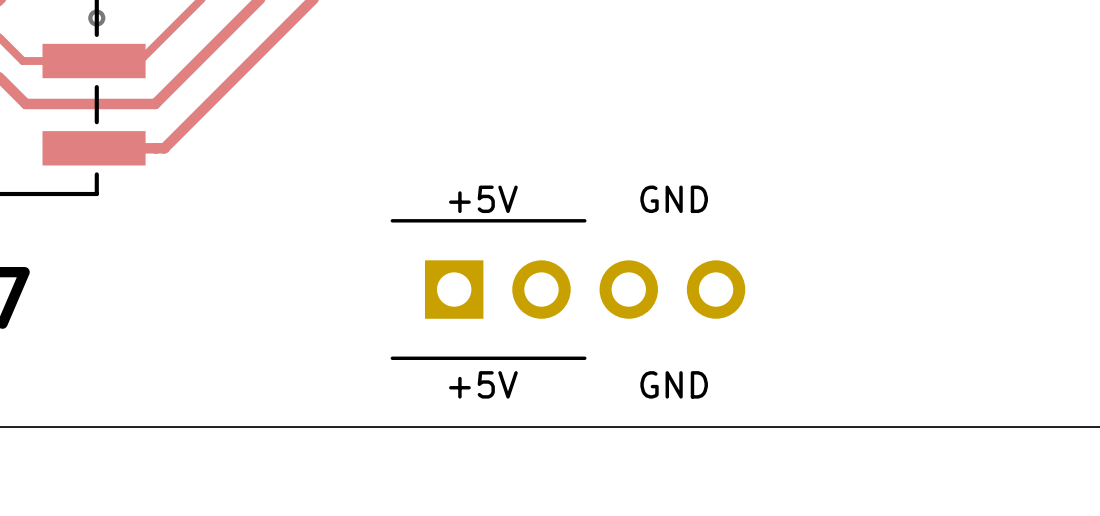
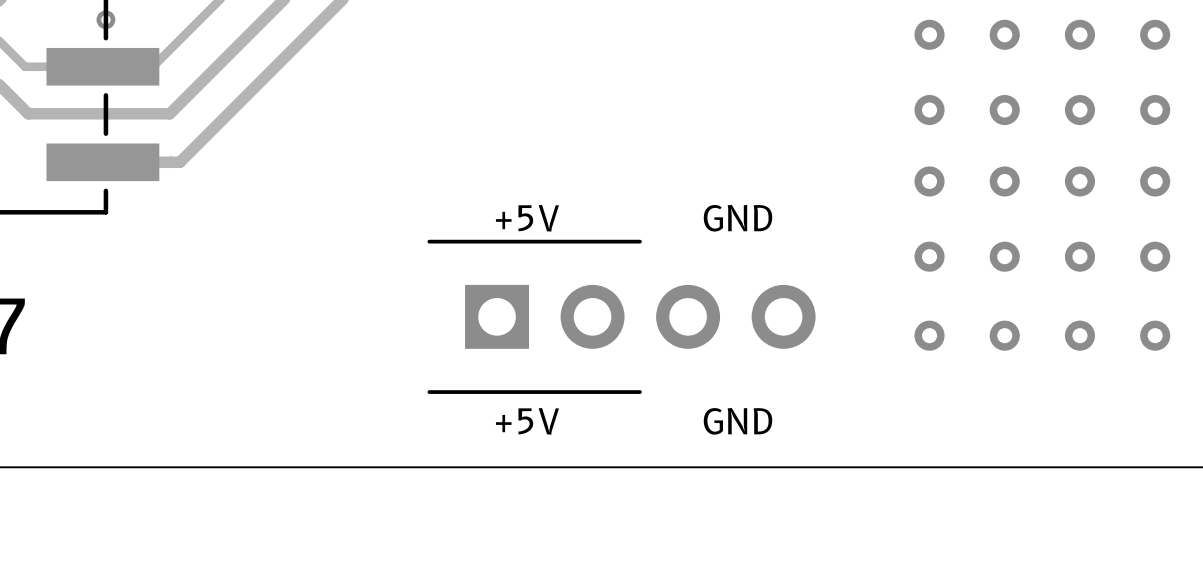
via: none -> (929, 34)
via: none -> (1004, 34)
via: none -> (1079, 34)
via: none -> (1155, 34)
via: none -> (929, 110)
via: none -> (1004, 110)
via: none -> (1079, 110)
via: none -> (1155, 110)
via: none -> (929, 181)
via: none -> (1004, 181)
via: none -> (1079, 181)
via: none -> (1155, 181)
via: none -> (929, 256)
via: none -> (1004, 256)
via: none -> (1079, 256)
via: none -> (1155, 256)
via: none -> (929, 335)
via: none -> (1004, 335)
via: none -> (1079, 335)
via: none -> (1155, 335)

